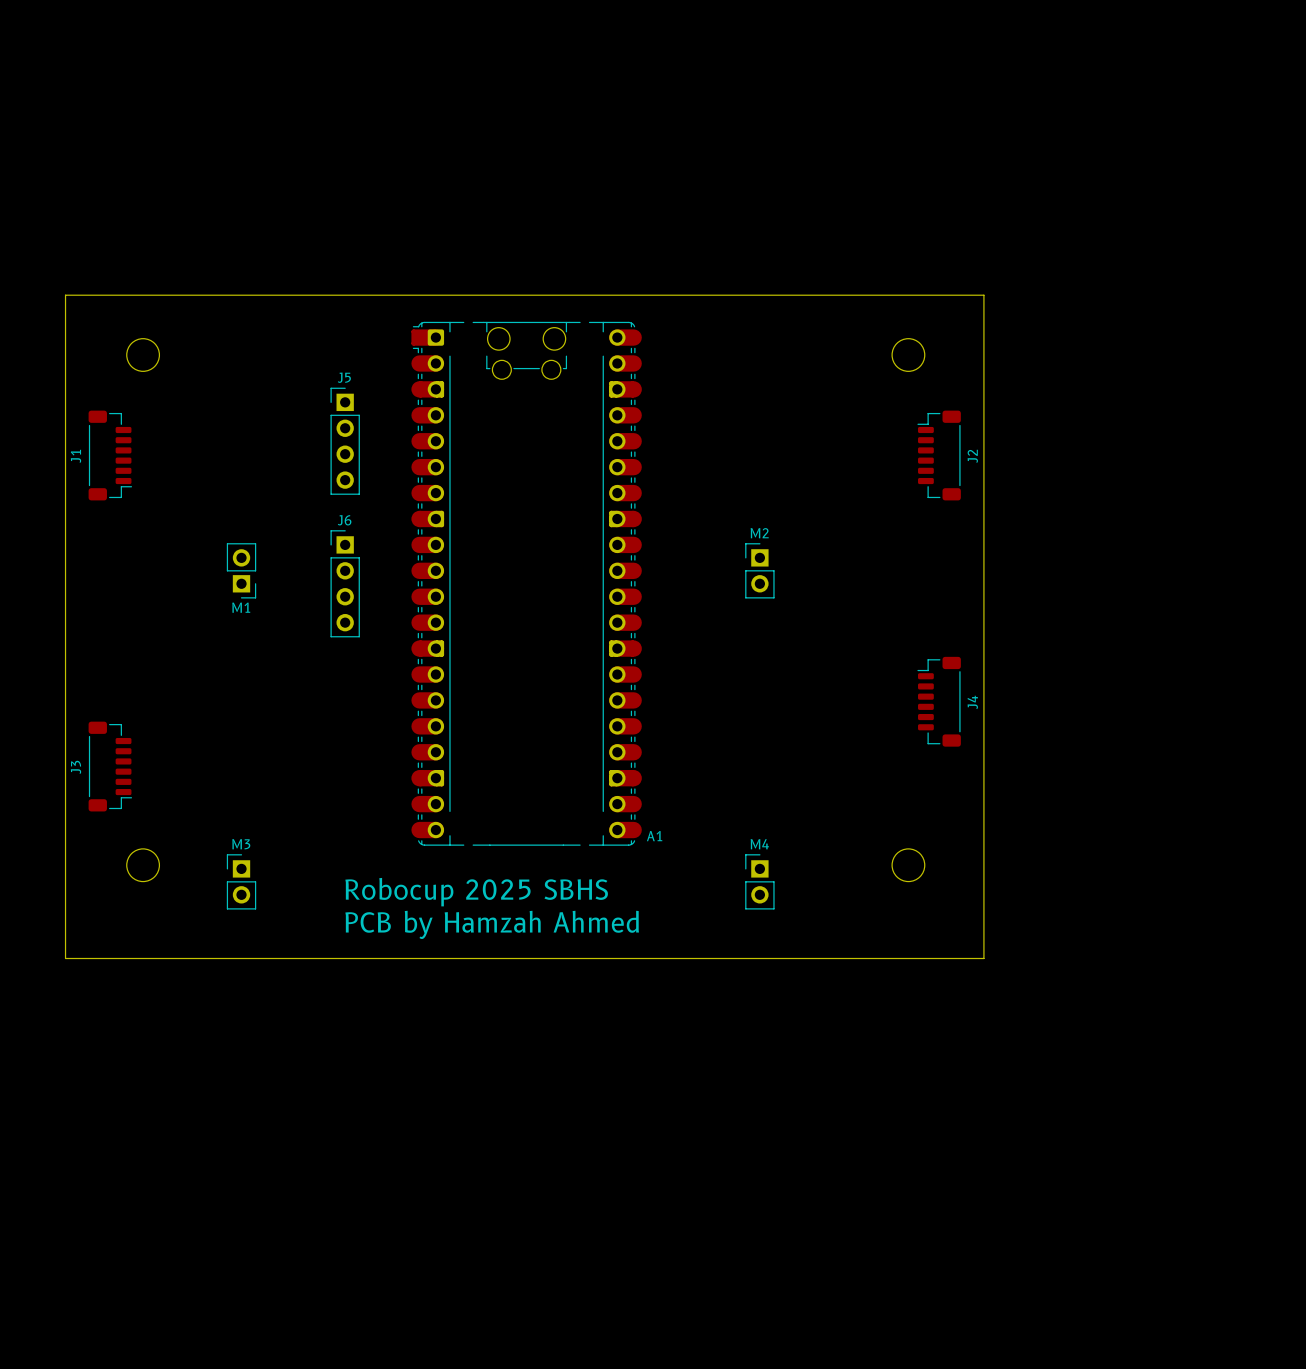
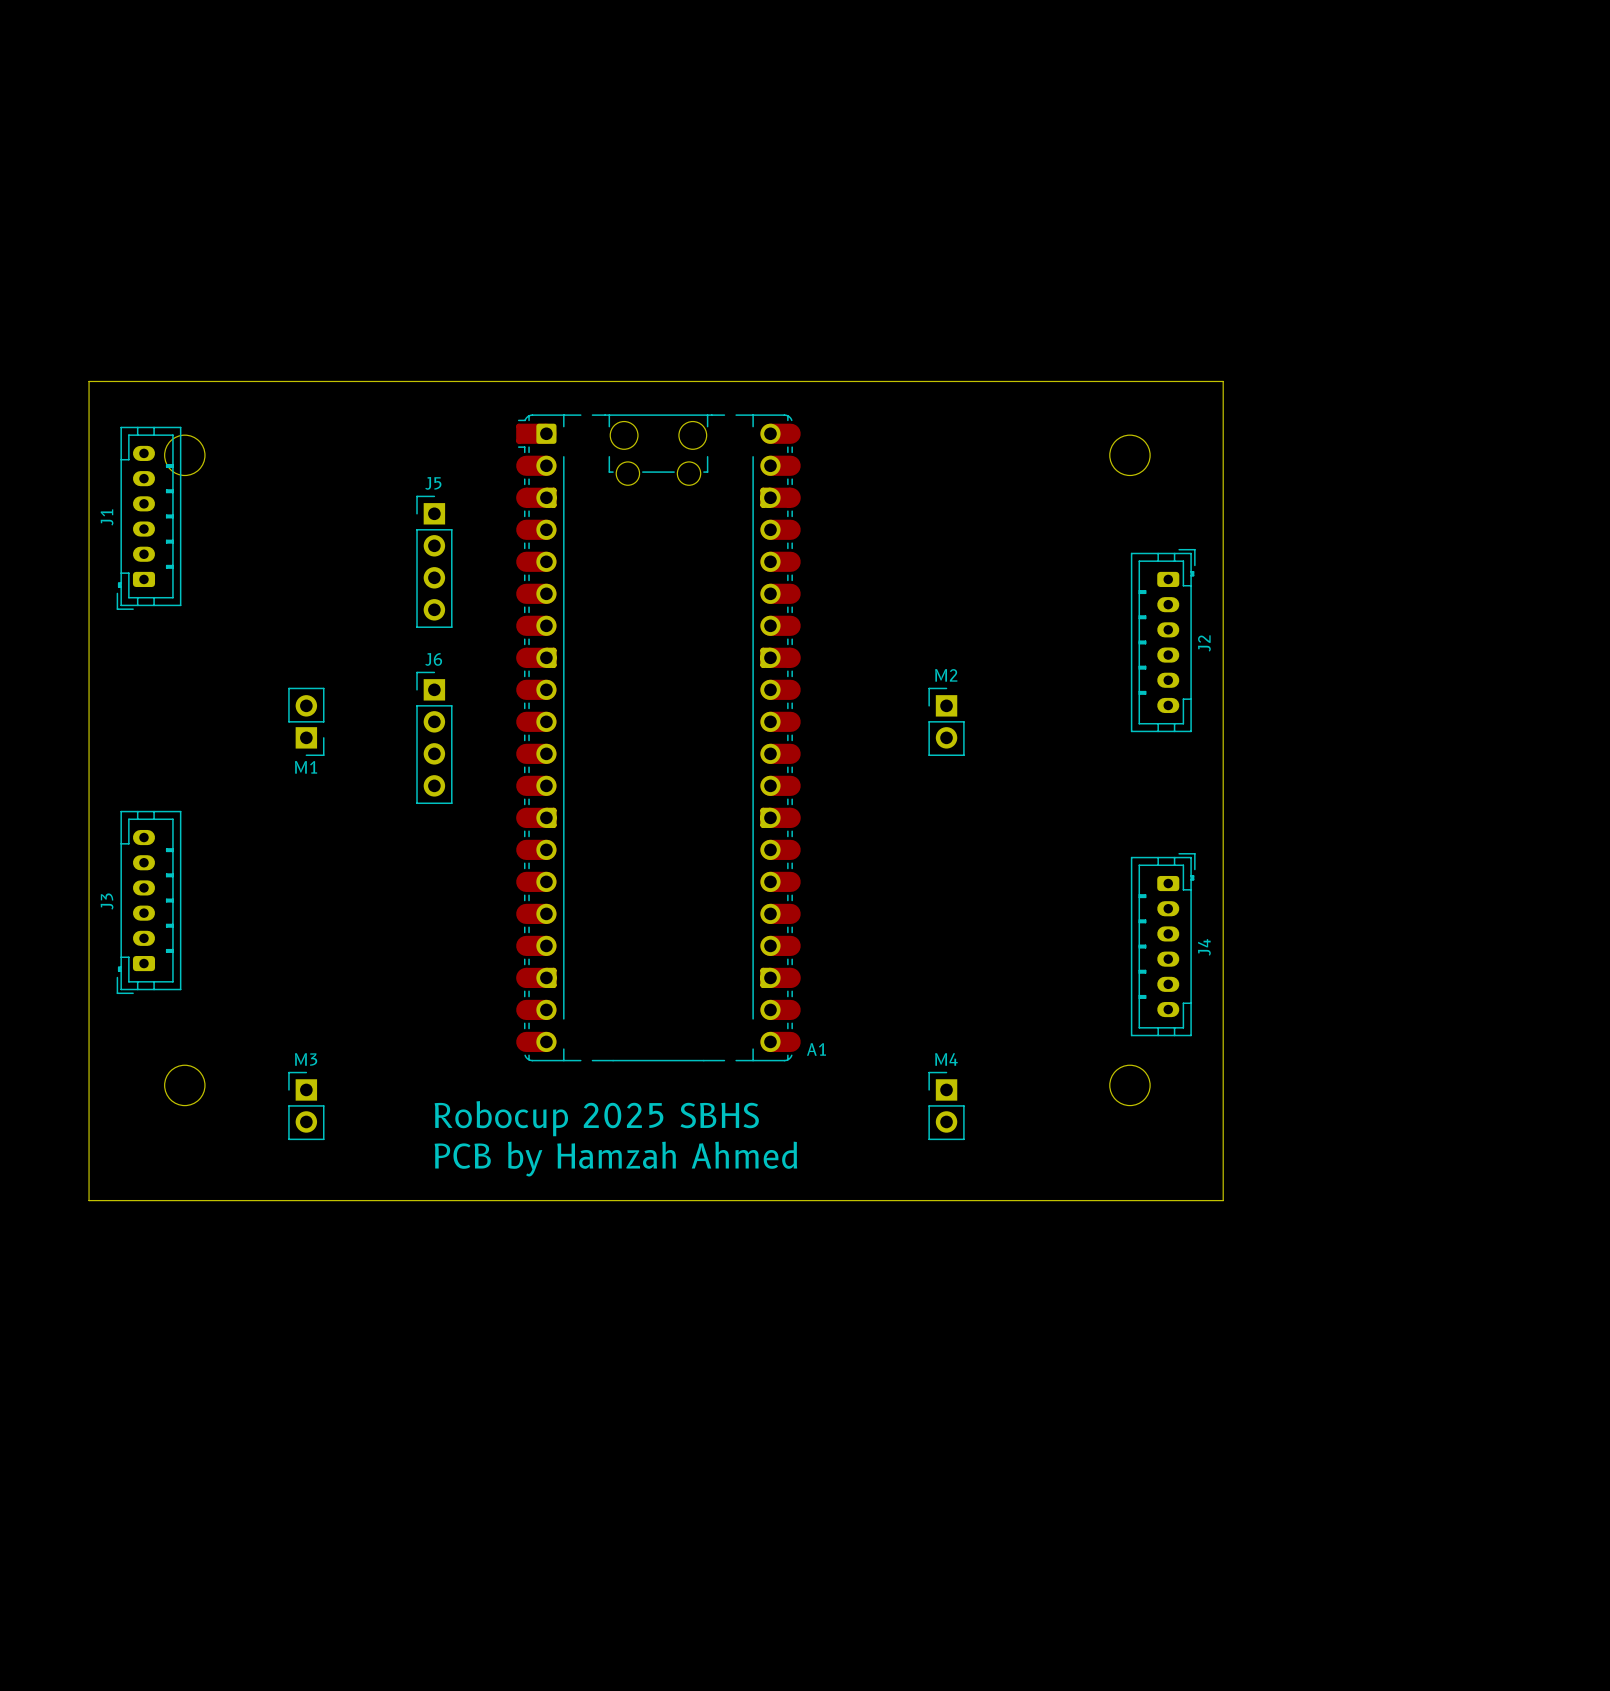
J1 footprint: [88, 410, 133, 501] -> [116, 426, 182, 610]
J2 footprint: [917, 410, 961, 501] -> [1130, 548, 1196, 733]
J4 footprint: [917, 656, 961, 747] -> [1130, 853, 1196, 1037]
J3 footprint: [88, 721, 133, 812] -> [116, 810, 182, 995]

